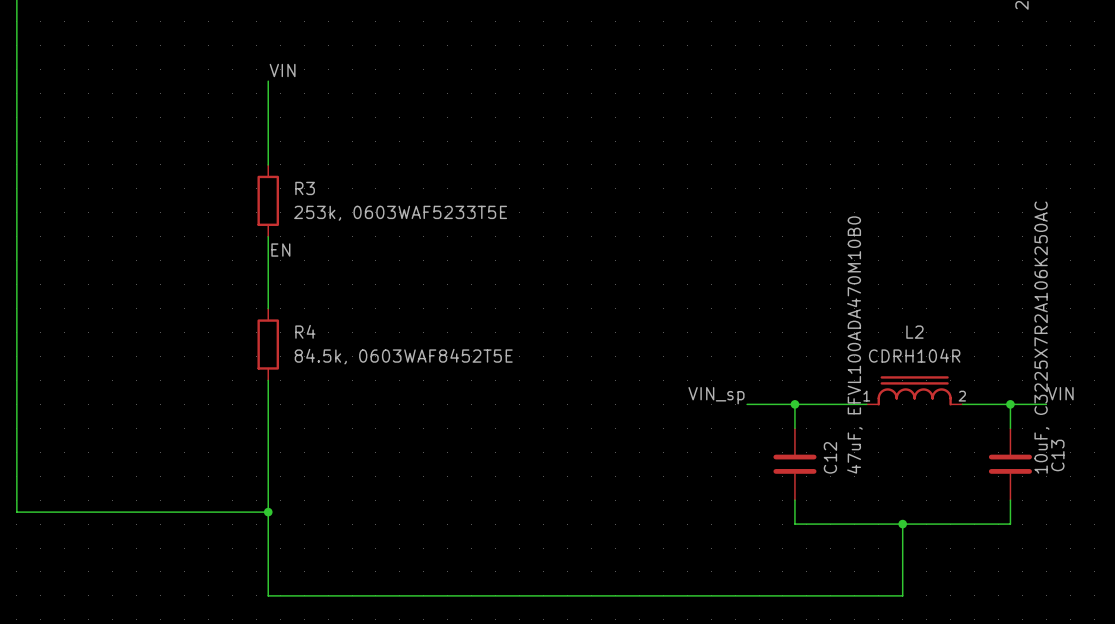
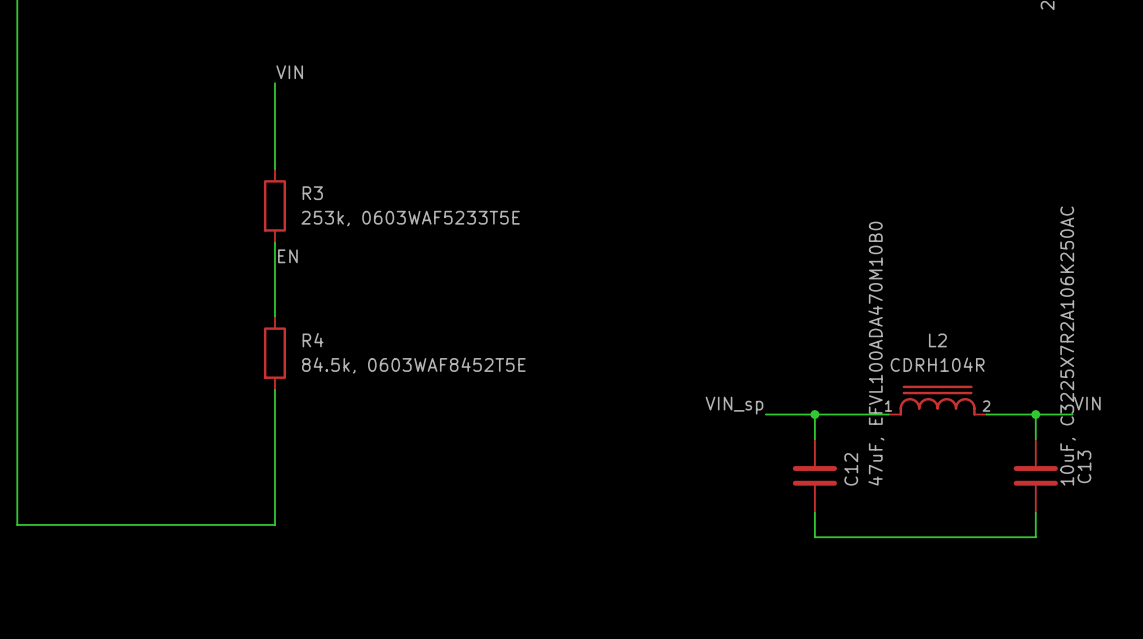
wire: (268, 512) (268, 595) (902, 595) (902, 524) -> none
junction: (268, 512) -> none
junction: (902, 524) -> none

